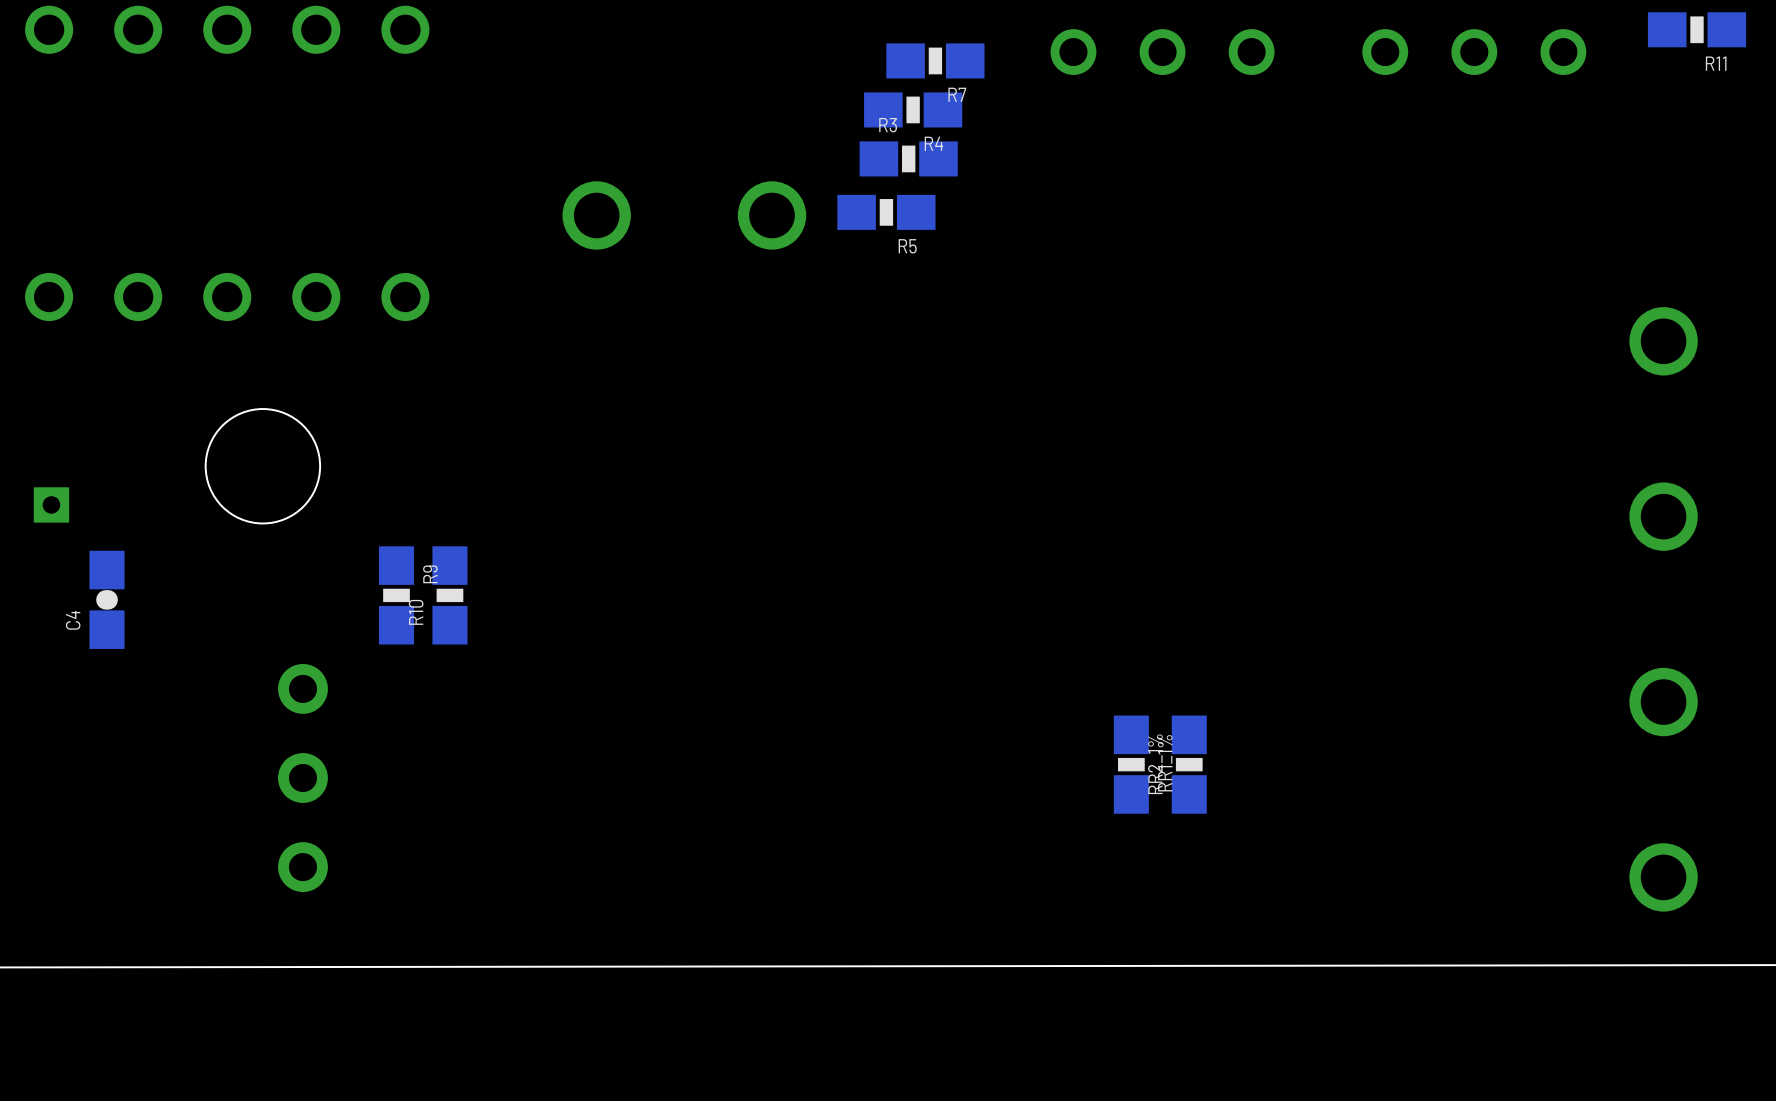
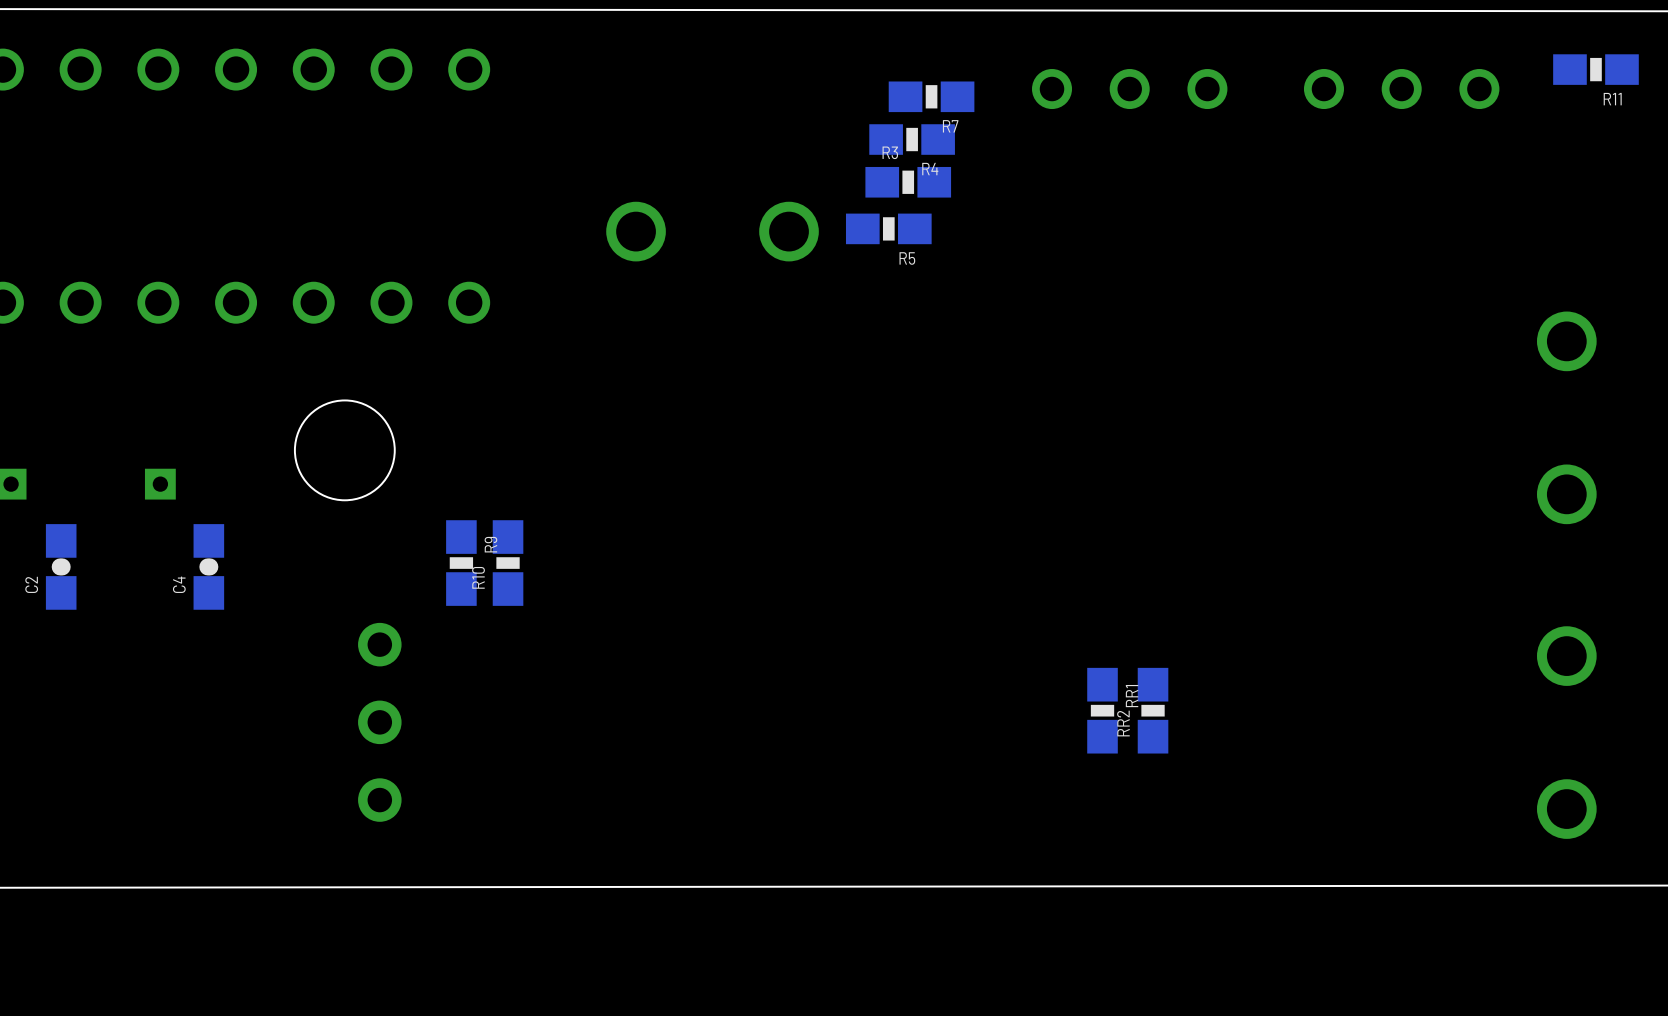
RR1_1% name: RR1_1% (1165, 763) -> RR1 (1132, 696)
RR2_1% name: RR2_1% (1155, 764) -> RR2 (1123, 723)

